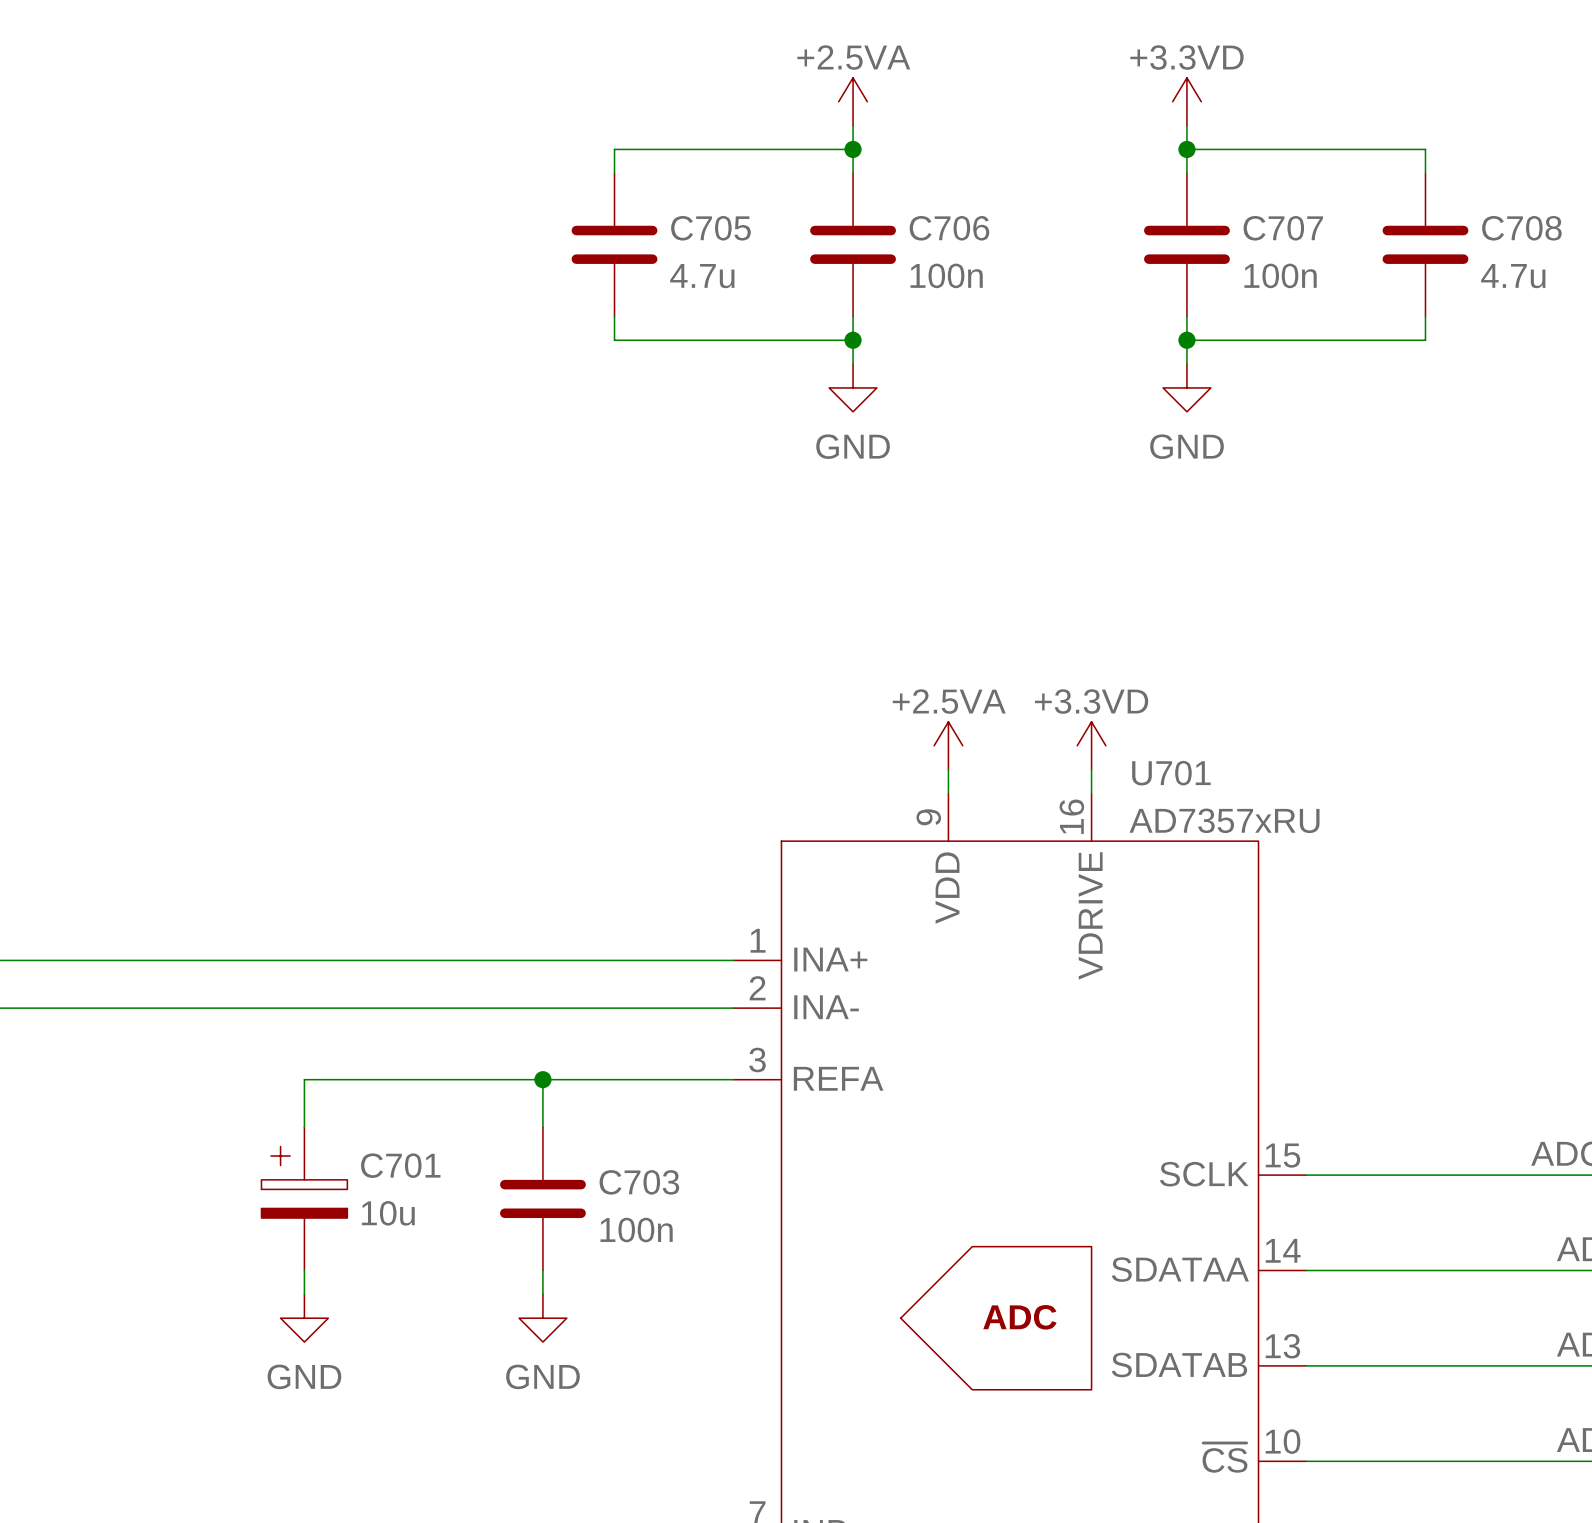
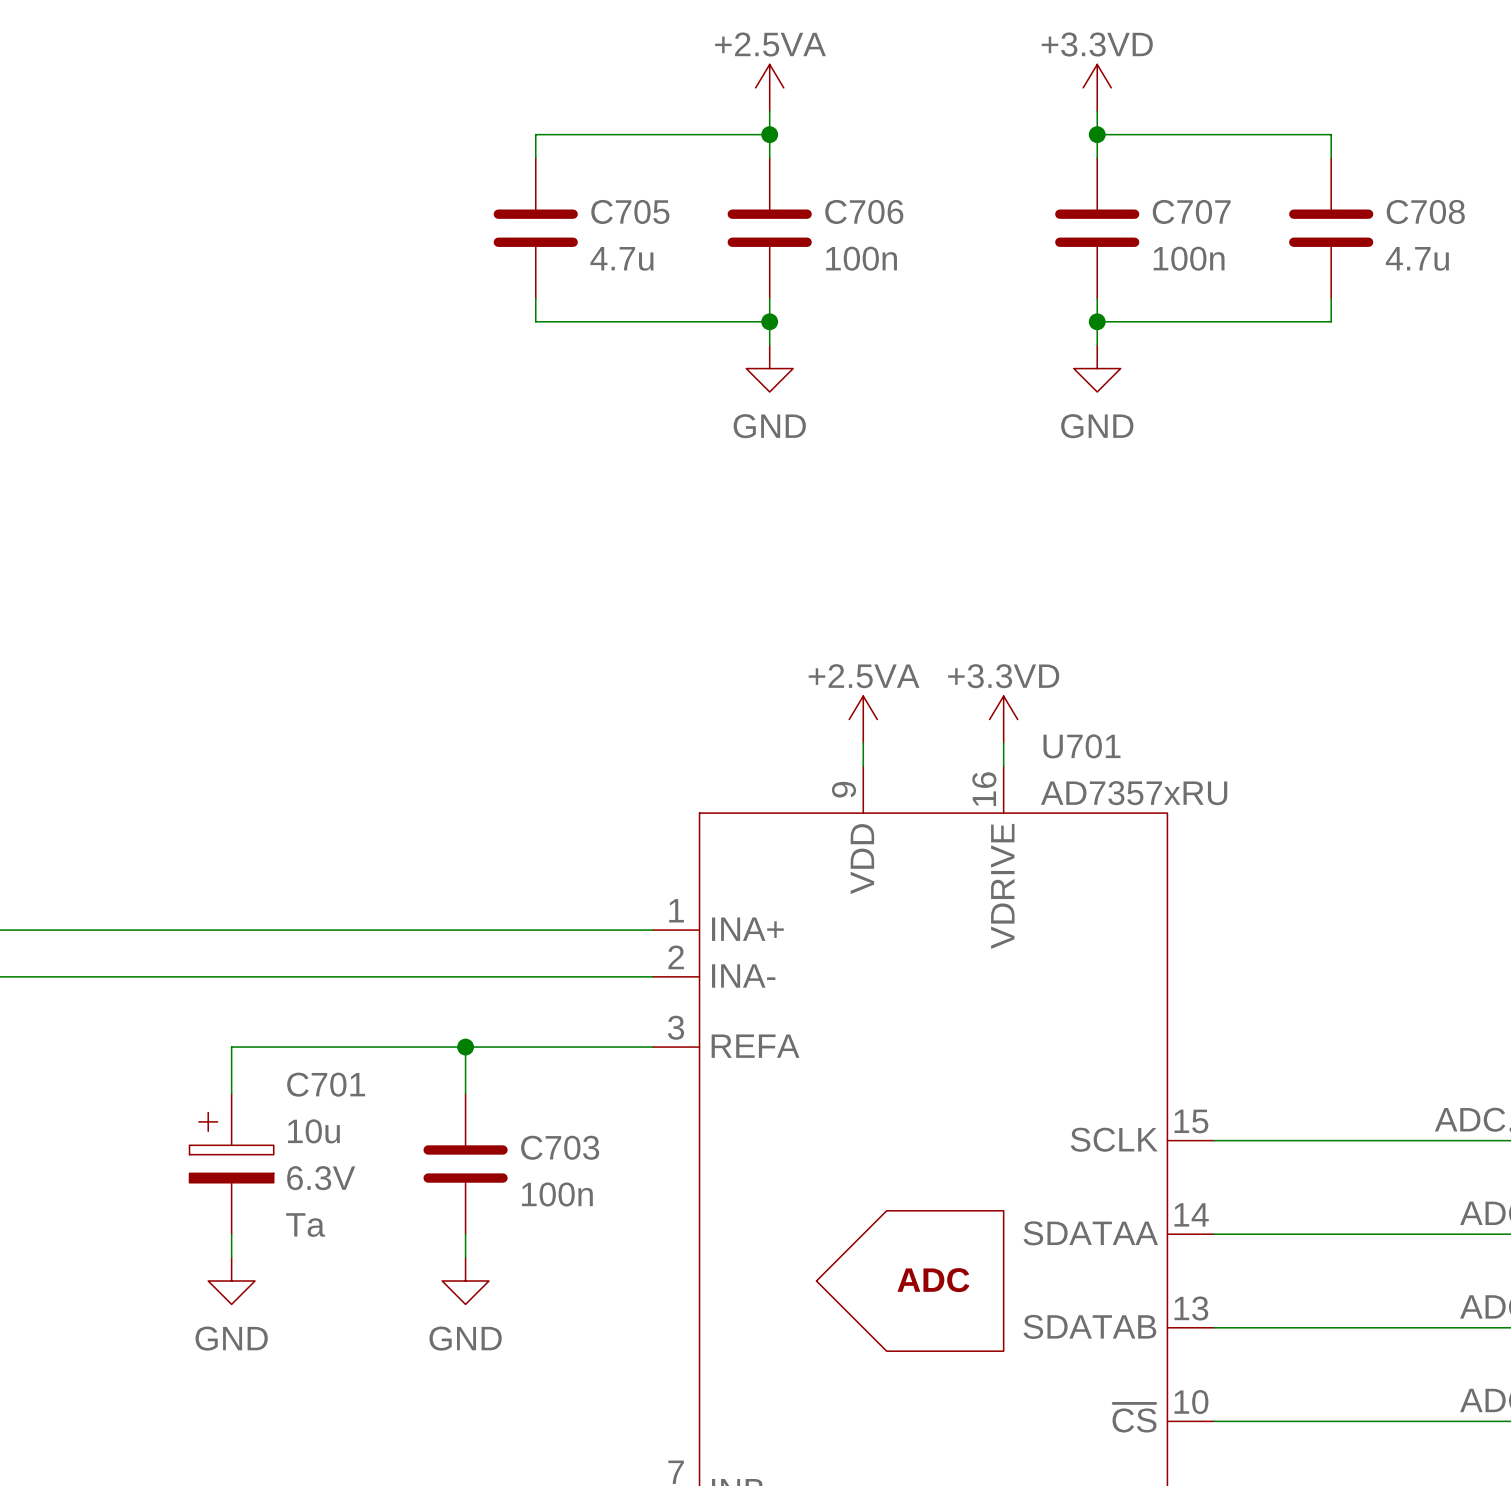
C701 name position: C701 (400, 1165) -> C701 (326, 1084)
C701 value position: 10u (388, 1213) -> 10u (313, 1131)
C701 text: none -> 6.3V (321, 1178)
C701 text: none -> Ta (305, 1225)

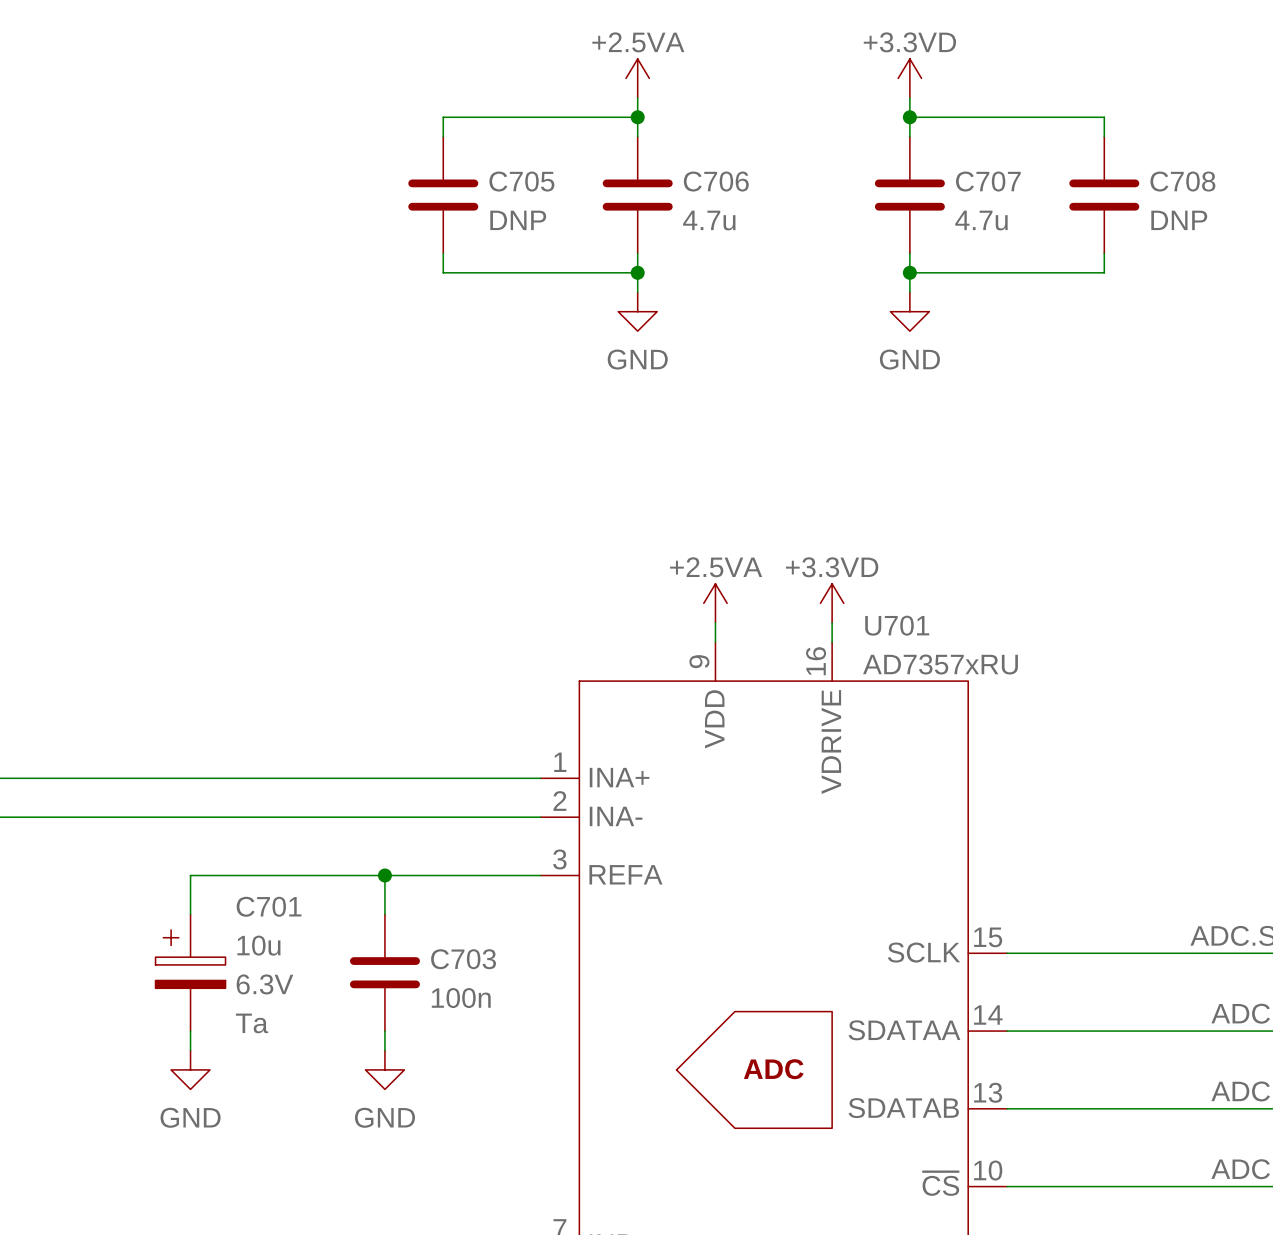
C705 value: 4.7u (621, 258) -> DNP (518, 220)
C706 value: 100n (861, 258) -> 4.7u (709, 220)
C707 value: 100n (1189, 258) -> 4.7u (981, 220)
C708 value: 4.7u (1417, 258) -> DNP (1179, 220)

